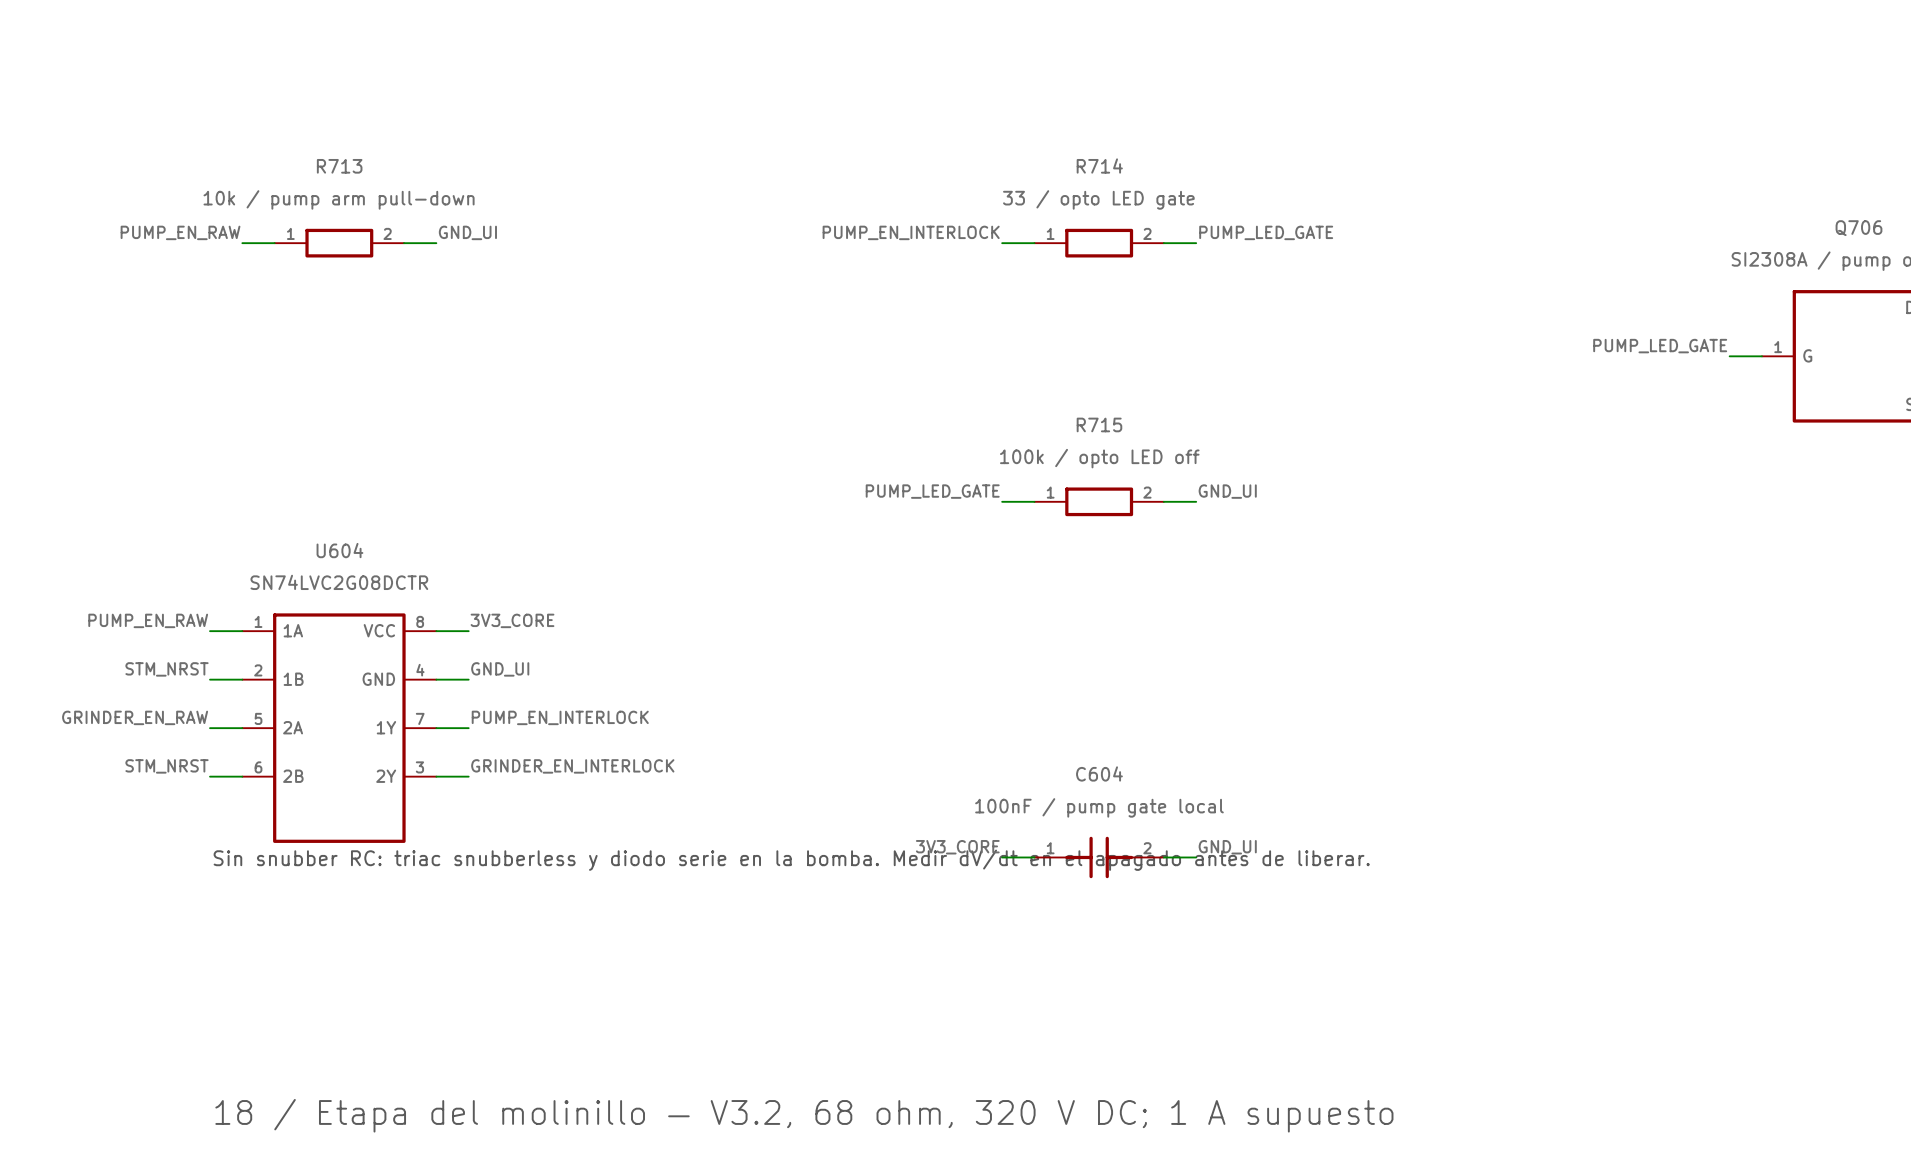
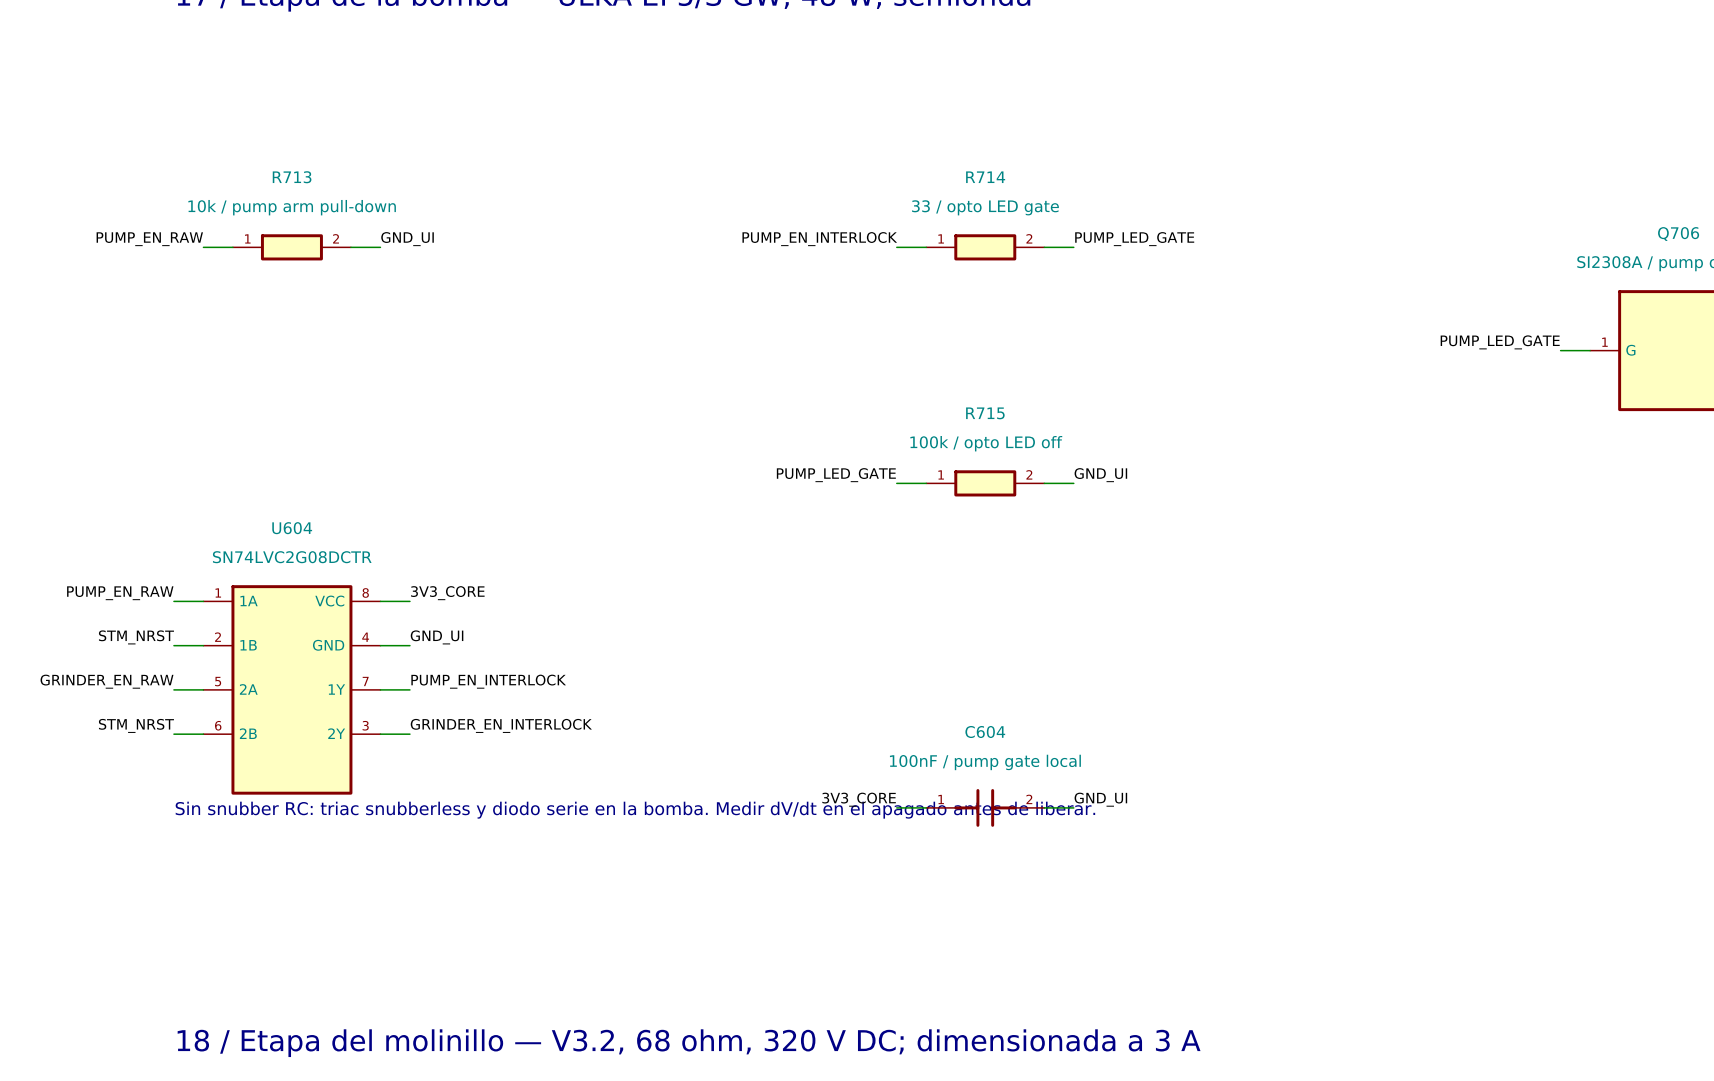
text: 18 / Etapa del molinillo — V3.2, 68 ohm, 320 V DC; 1 A supuesto (804, 1115) -> 18 / Etapa del molinillo — V3.2, 68 ohm, 320 V DC; dimensionada a 3 A (689, 1043)

